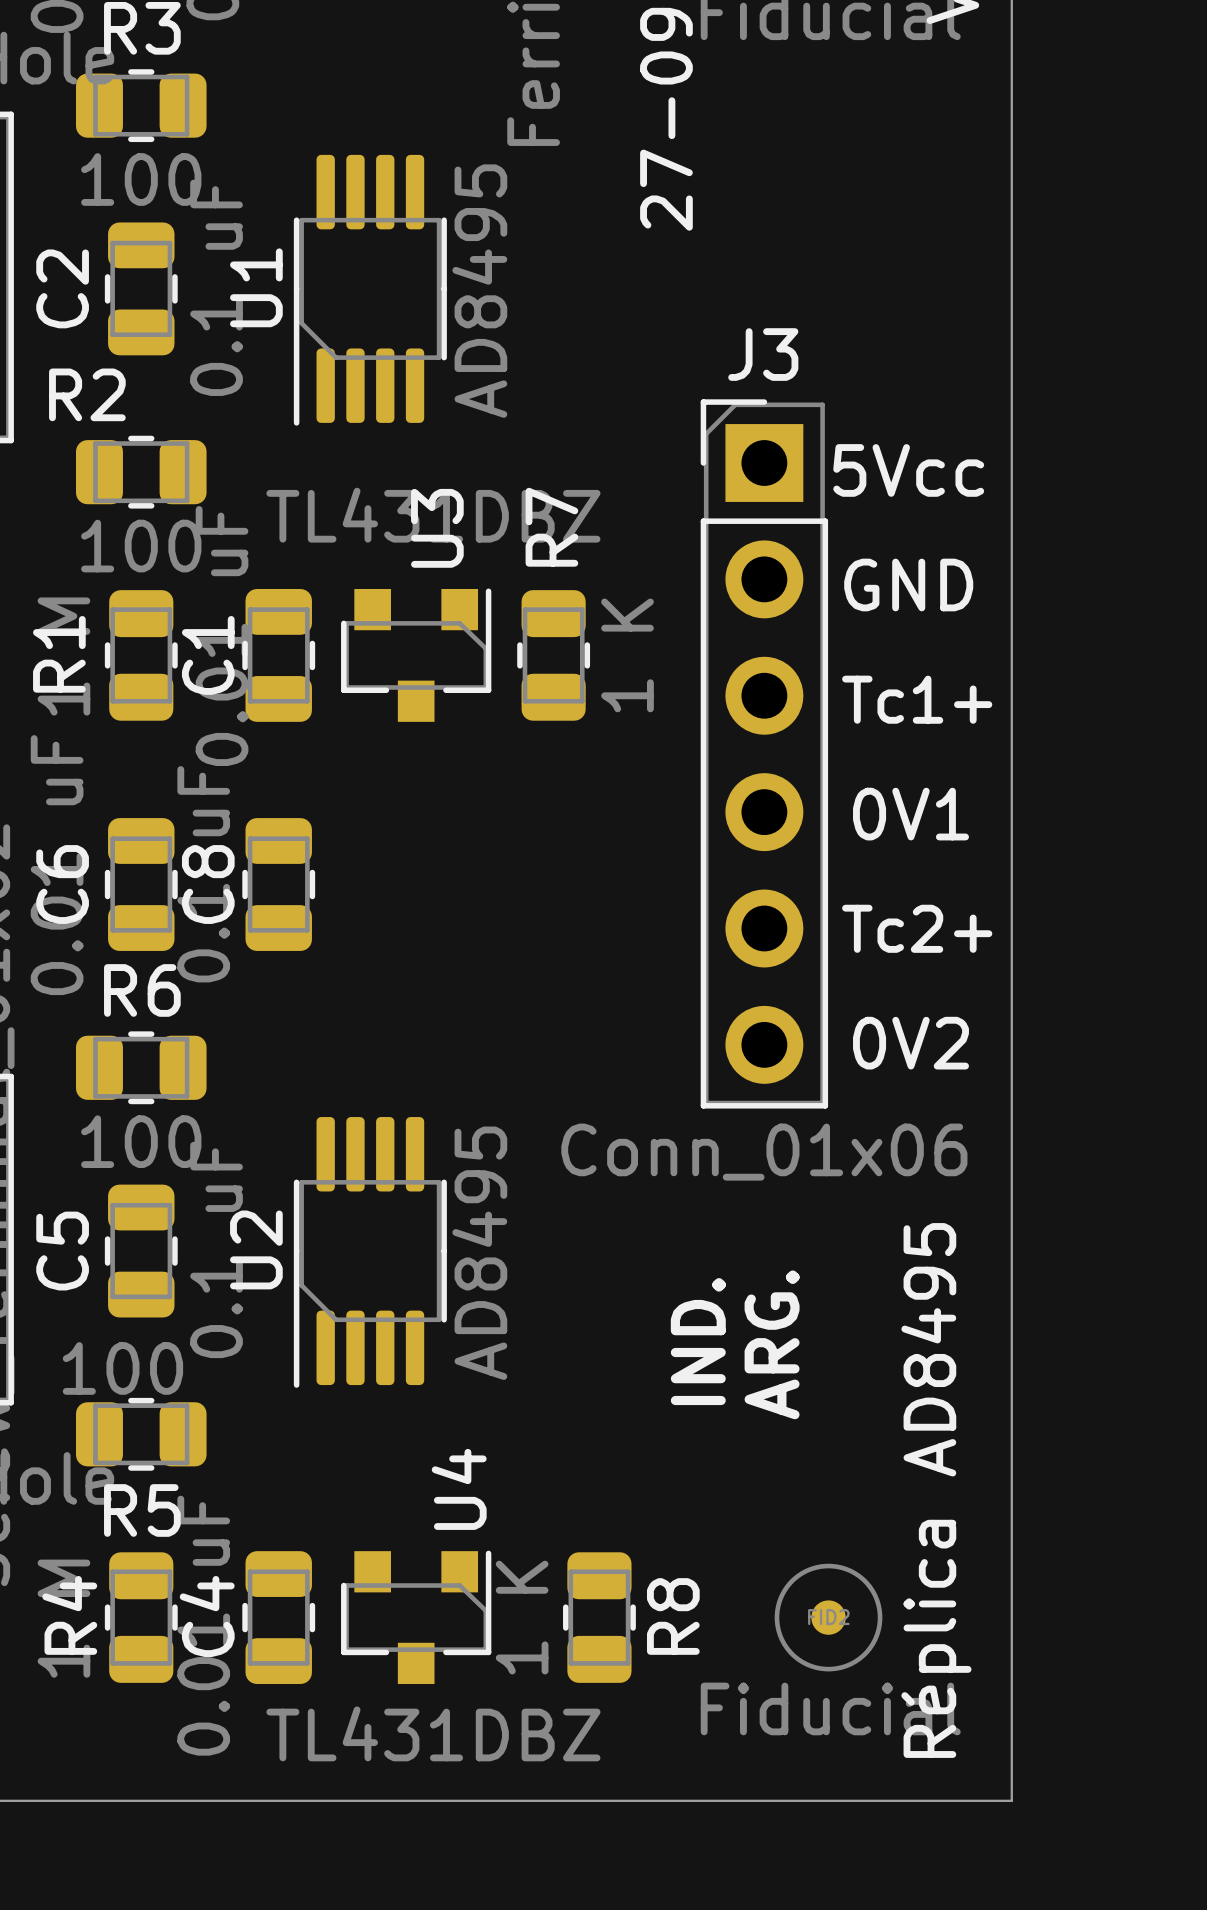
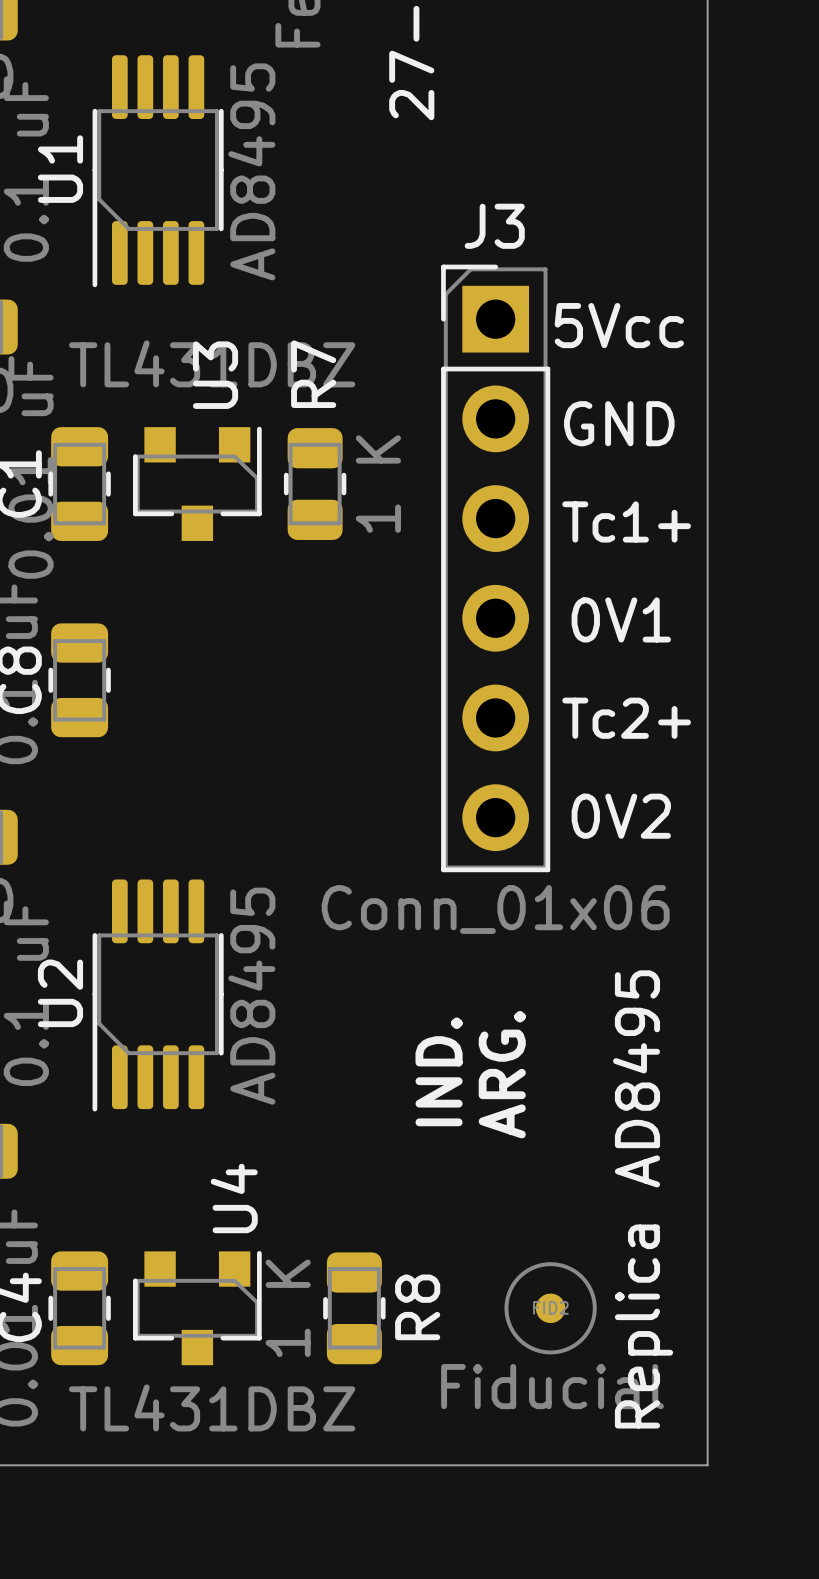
text: Réplica AD8495 (936, 1490) -> Replica AD8495 (643, 1199)

